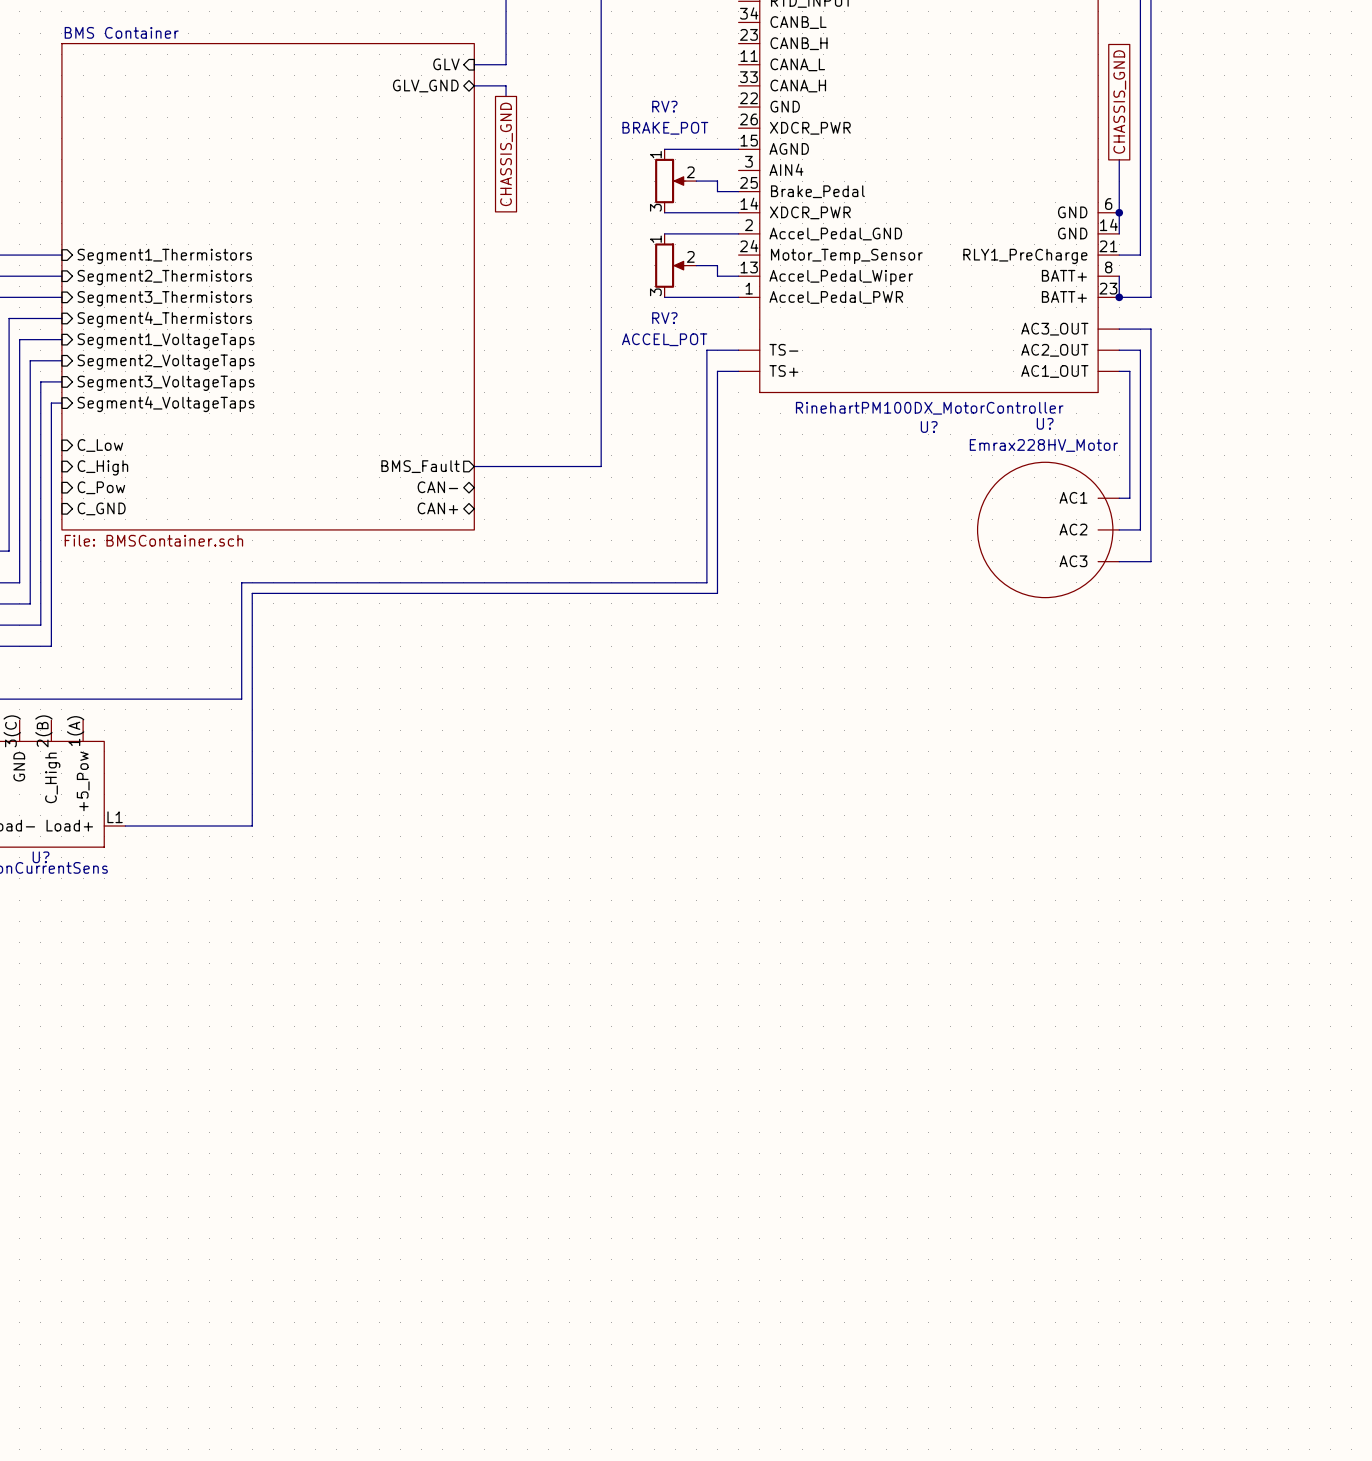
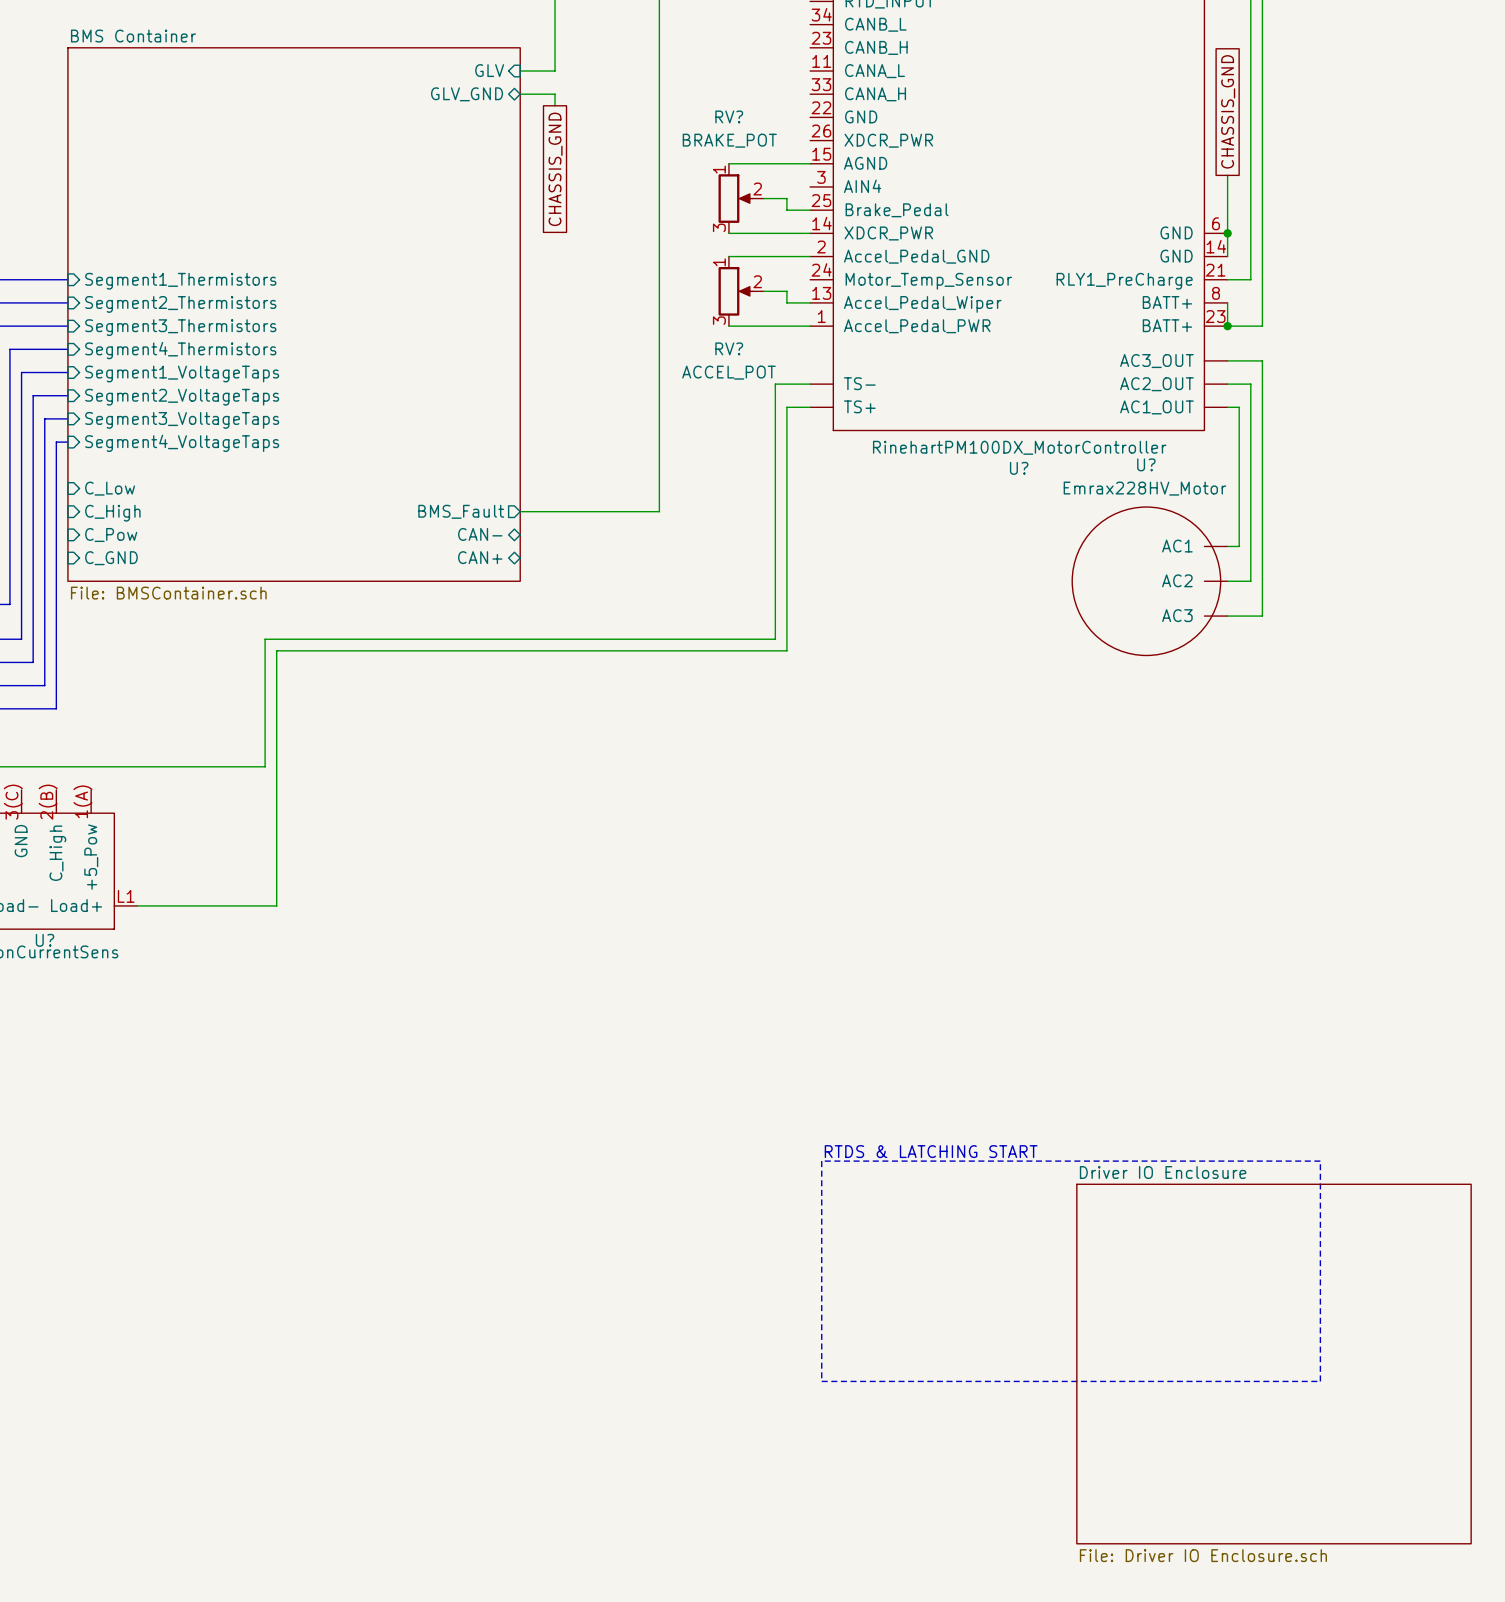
text: none -> RTDS & LATCHING START (931, 1151)
line: none -> (821, 1161) (1320, 1161) (1320, 1381) (821, 1381) (821, 1161)
sheet Driver IO Enclosure: none -> File: Driver IO Enclosure.sch (1274, 1364)

